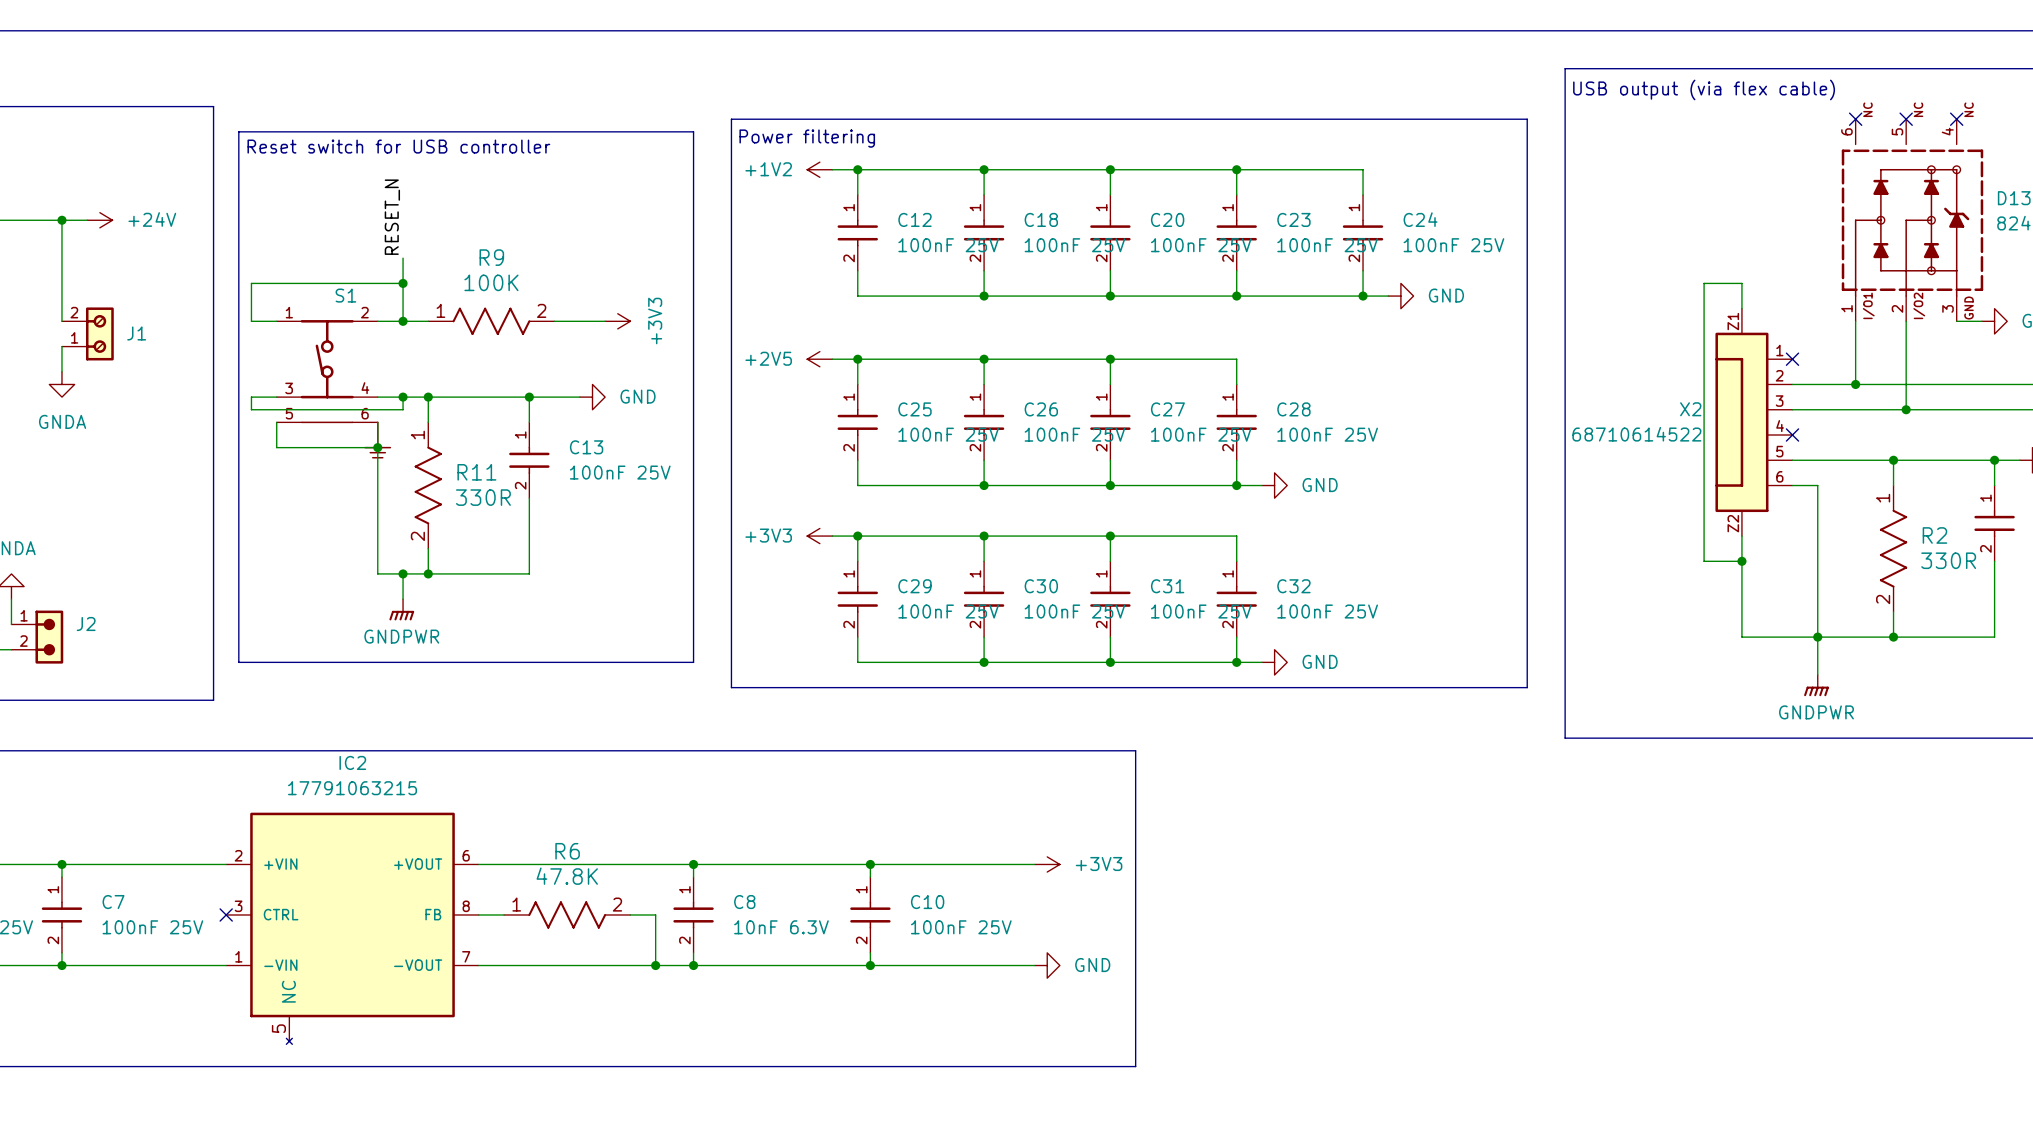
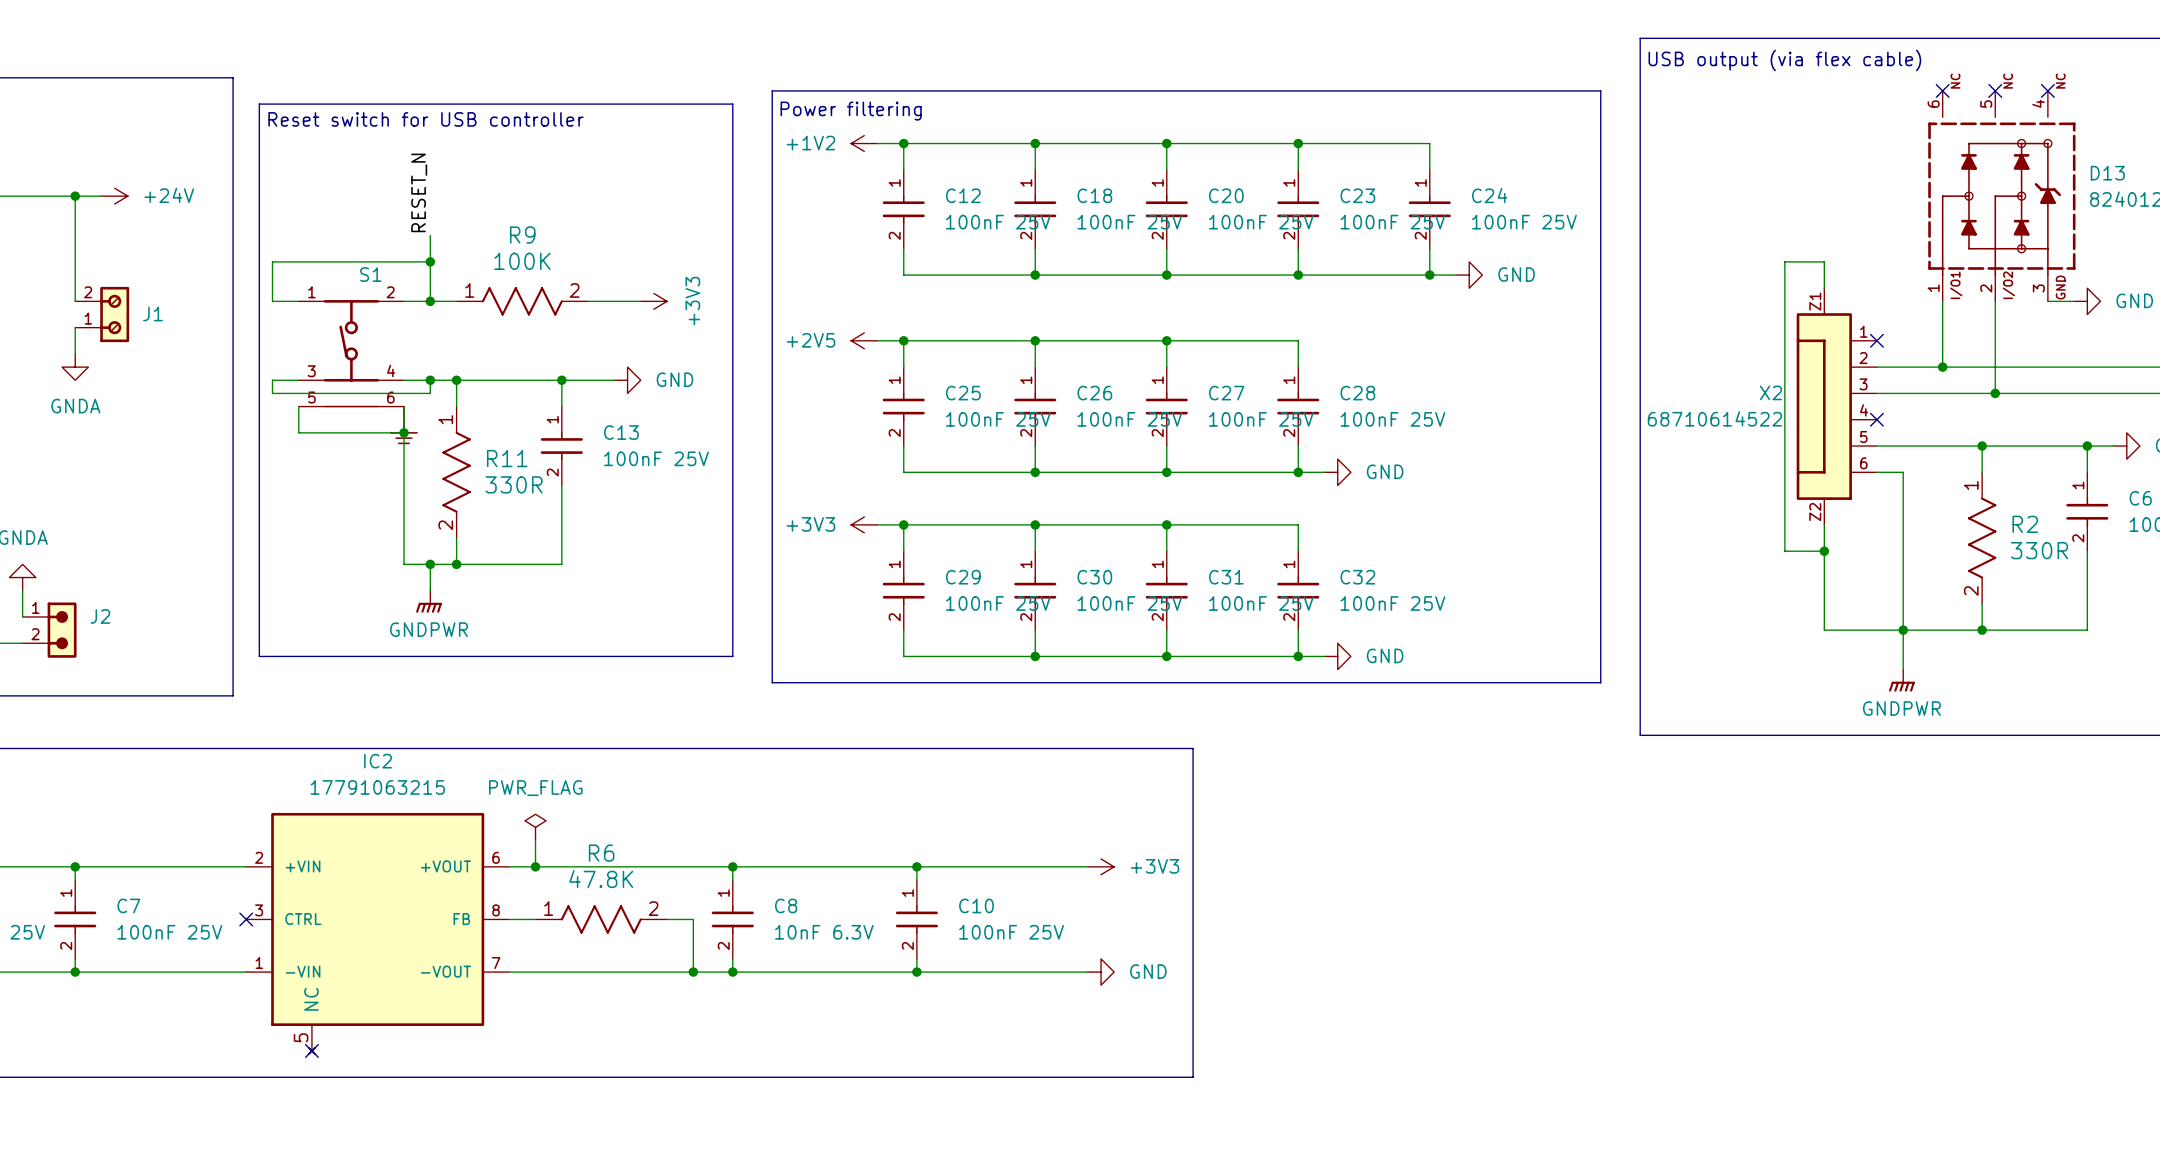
power symbol: none -> PWR_FLAG (535, 827)
wire: none -> (535, 840) (535, 866)
junction: none -> (535, 866)
no-connect mark: none -> (311, 1050)

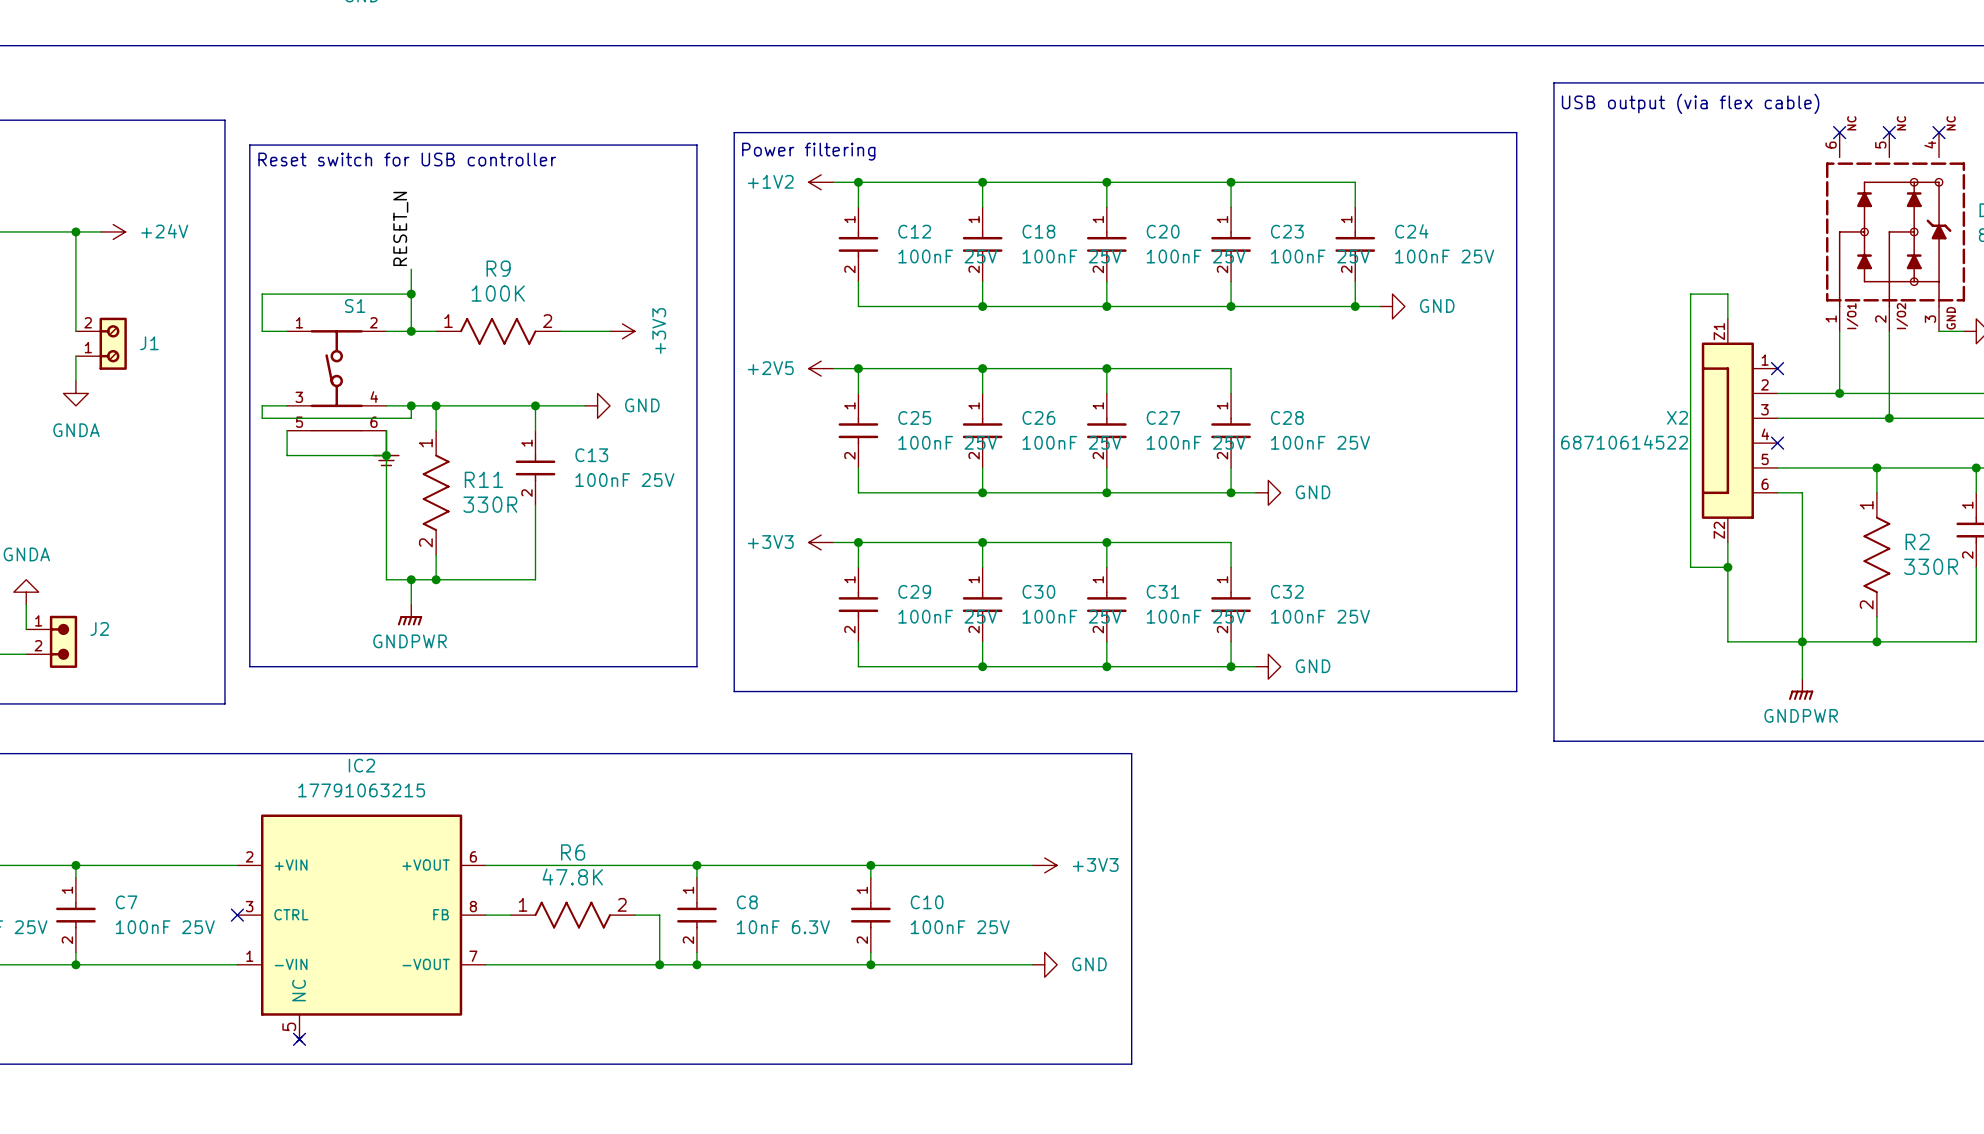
power symbol: PWR_FLAG (535, 827) -> none
wire: (535, 840) (535, 866) -> none
junction: (535, 866) -> none

